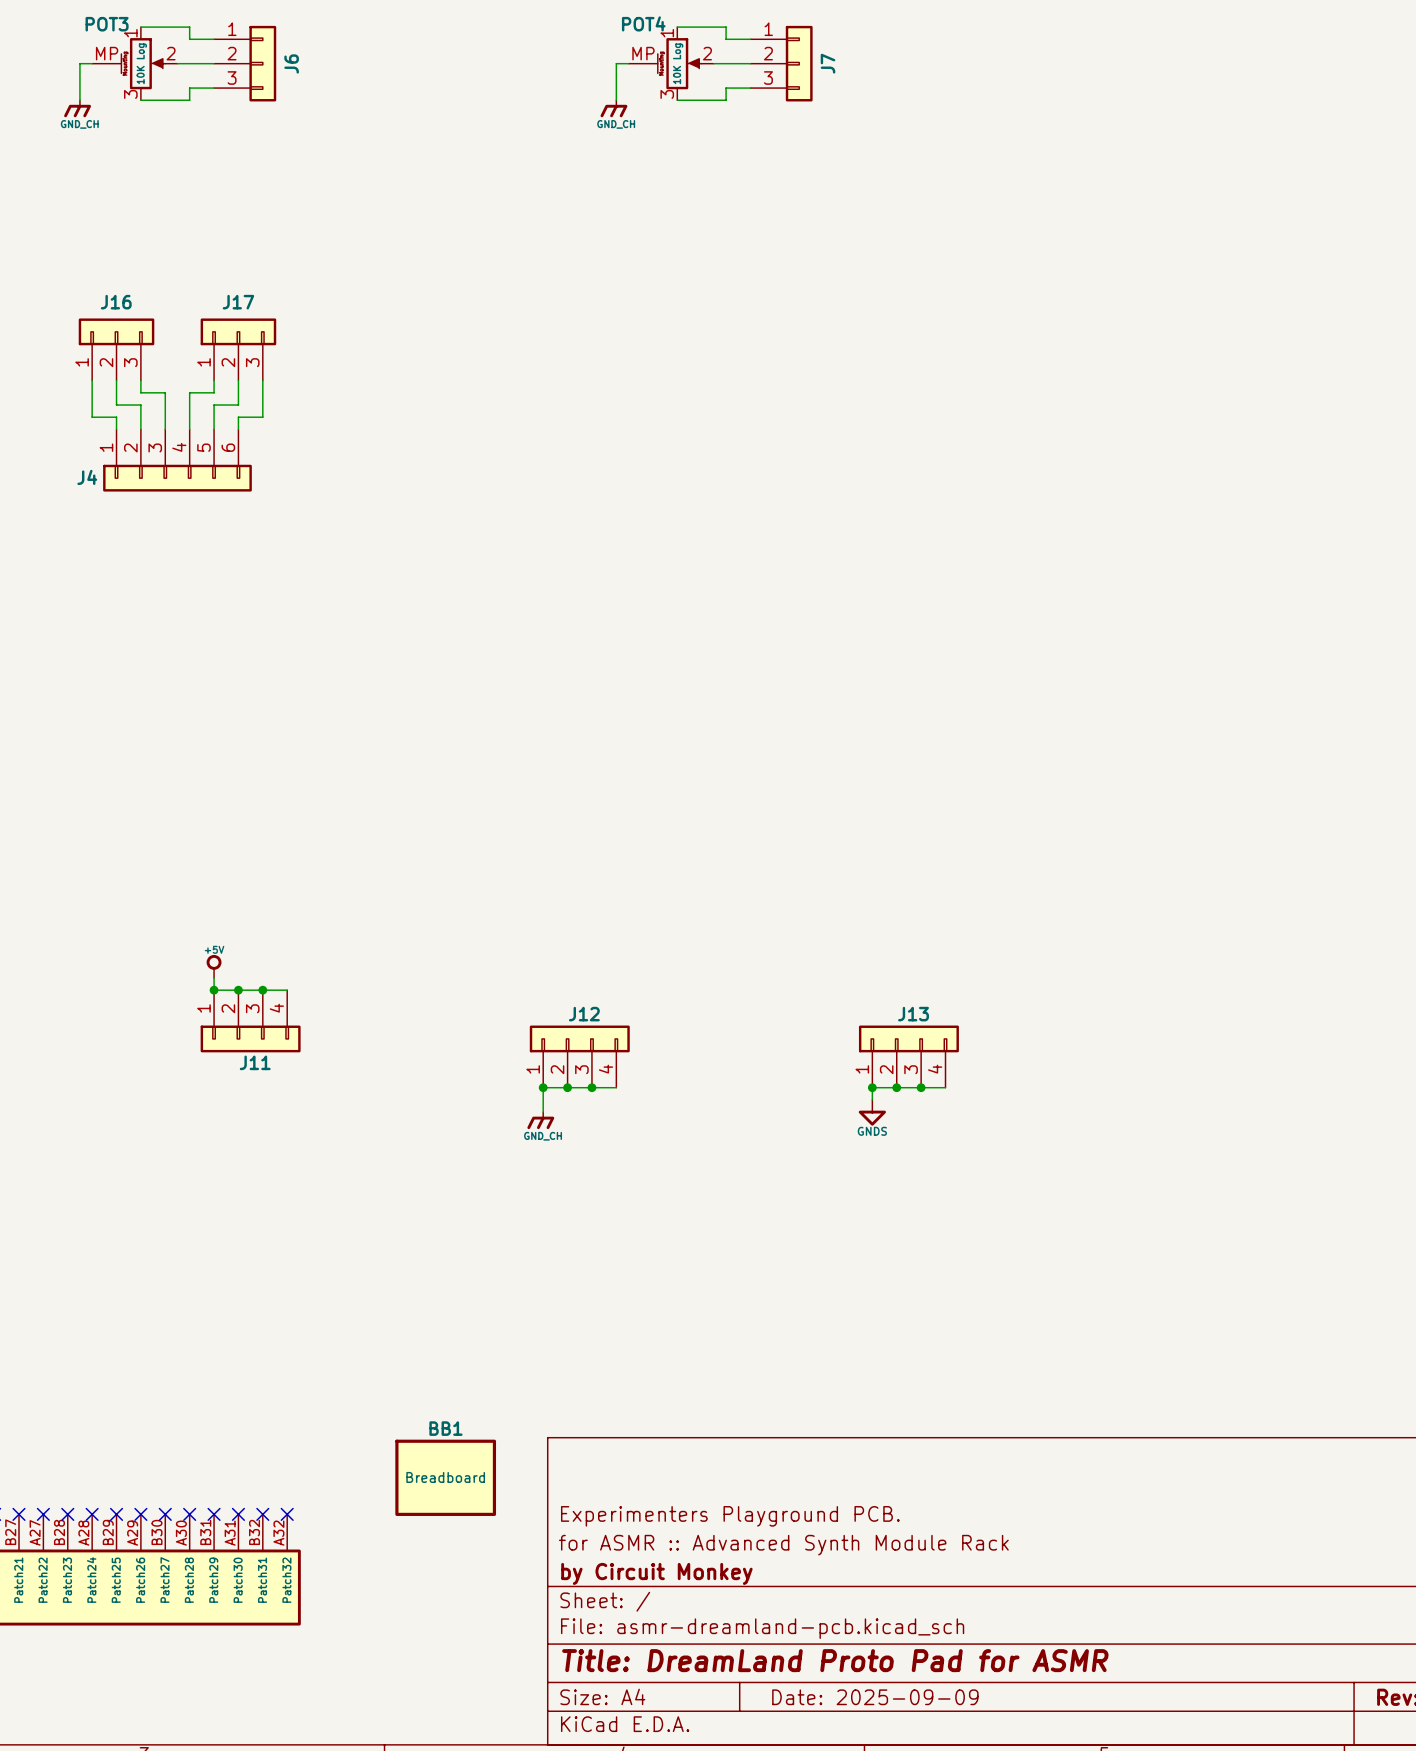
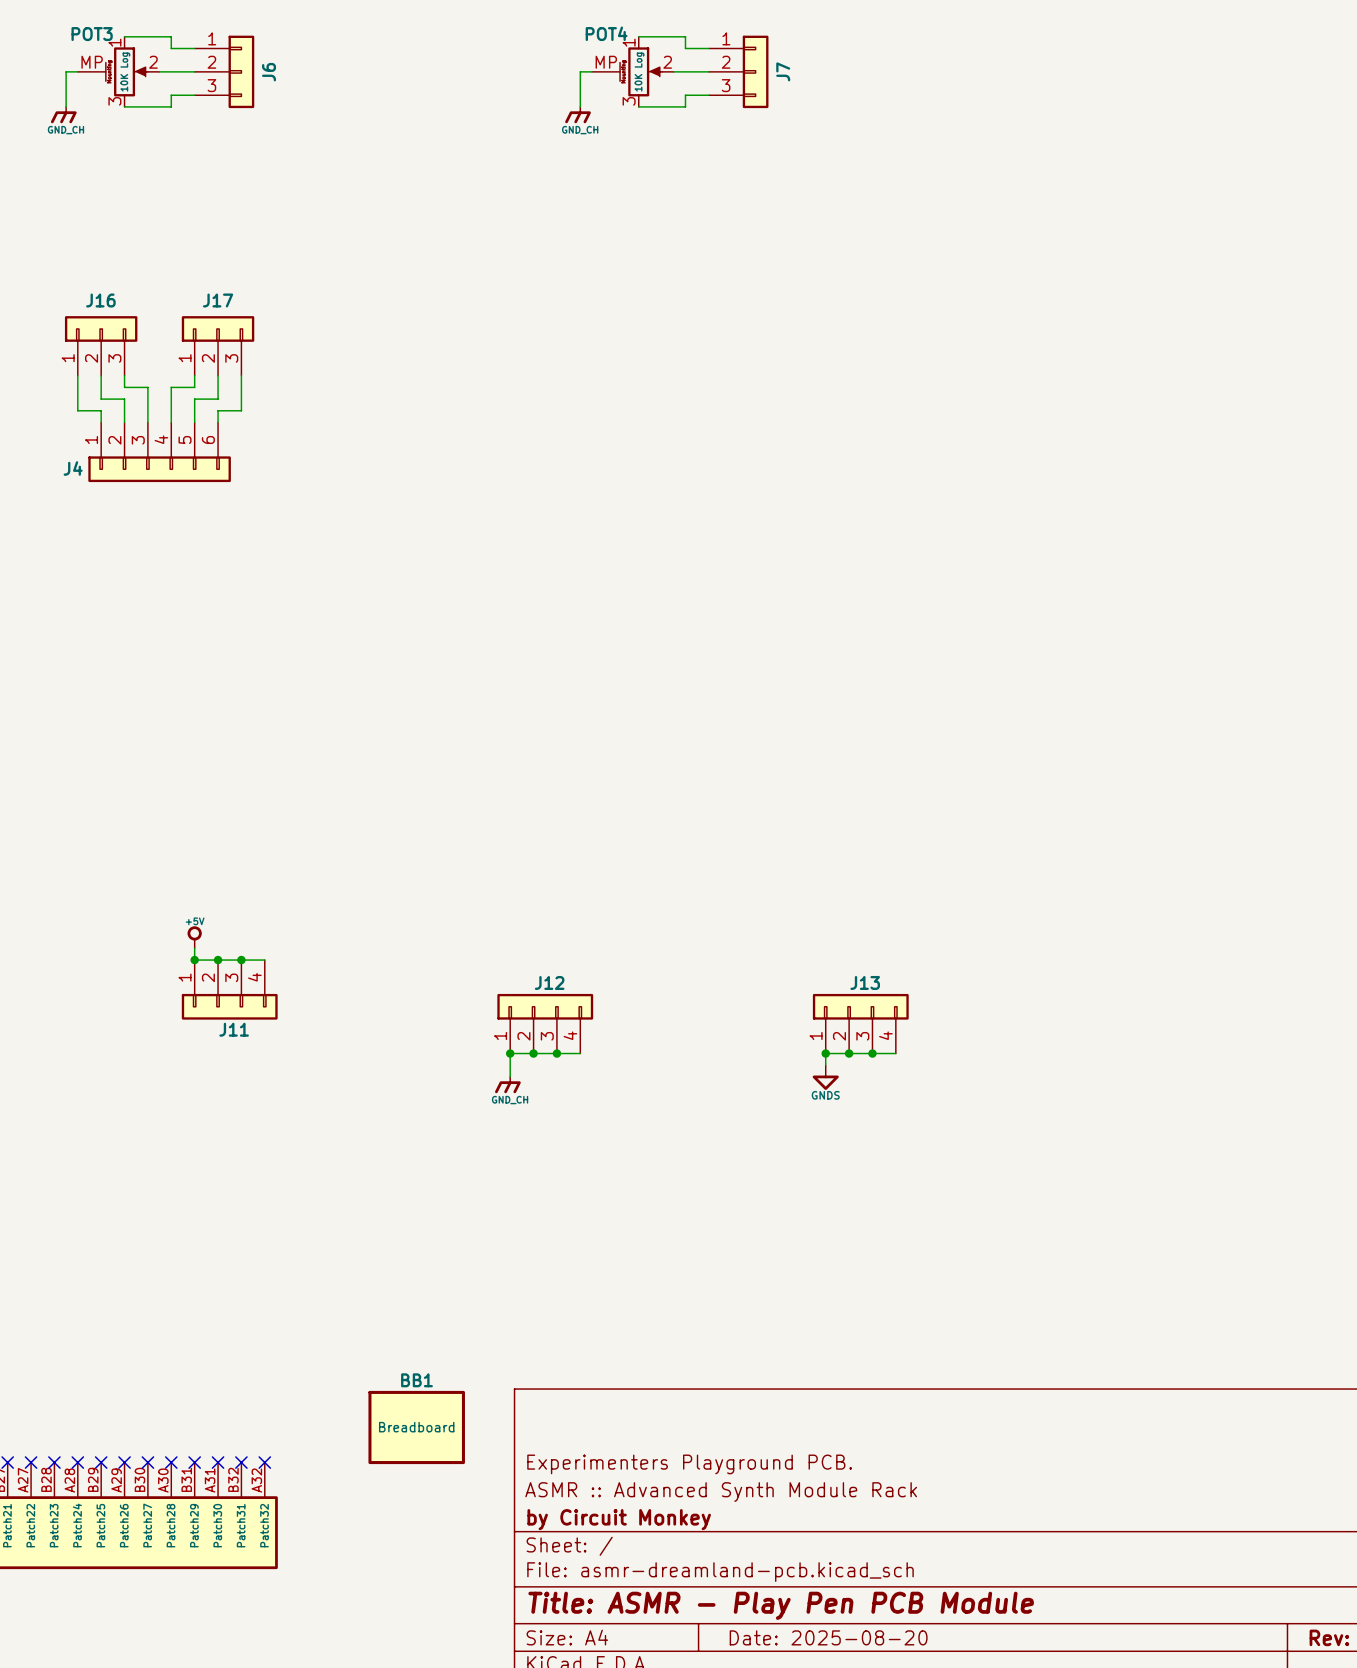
title block: for ASMR :: Advanced Synth Module Rack (783, 1545) -> ASMR :: Advanced Synth Module Rack (721, 1492)
title block: Title: DreamLand Proto Pad for ASMR (835, 1660) -> Title: ASMR - Play Pen PCB Module (781, 1605)
title block: Date: 2025-09-09 (875, 1697) -> Date: 2025-08-20 (828, 1637)

